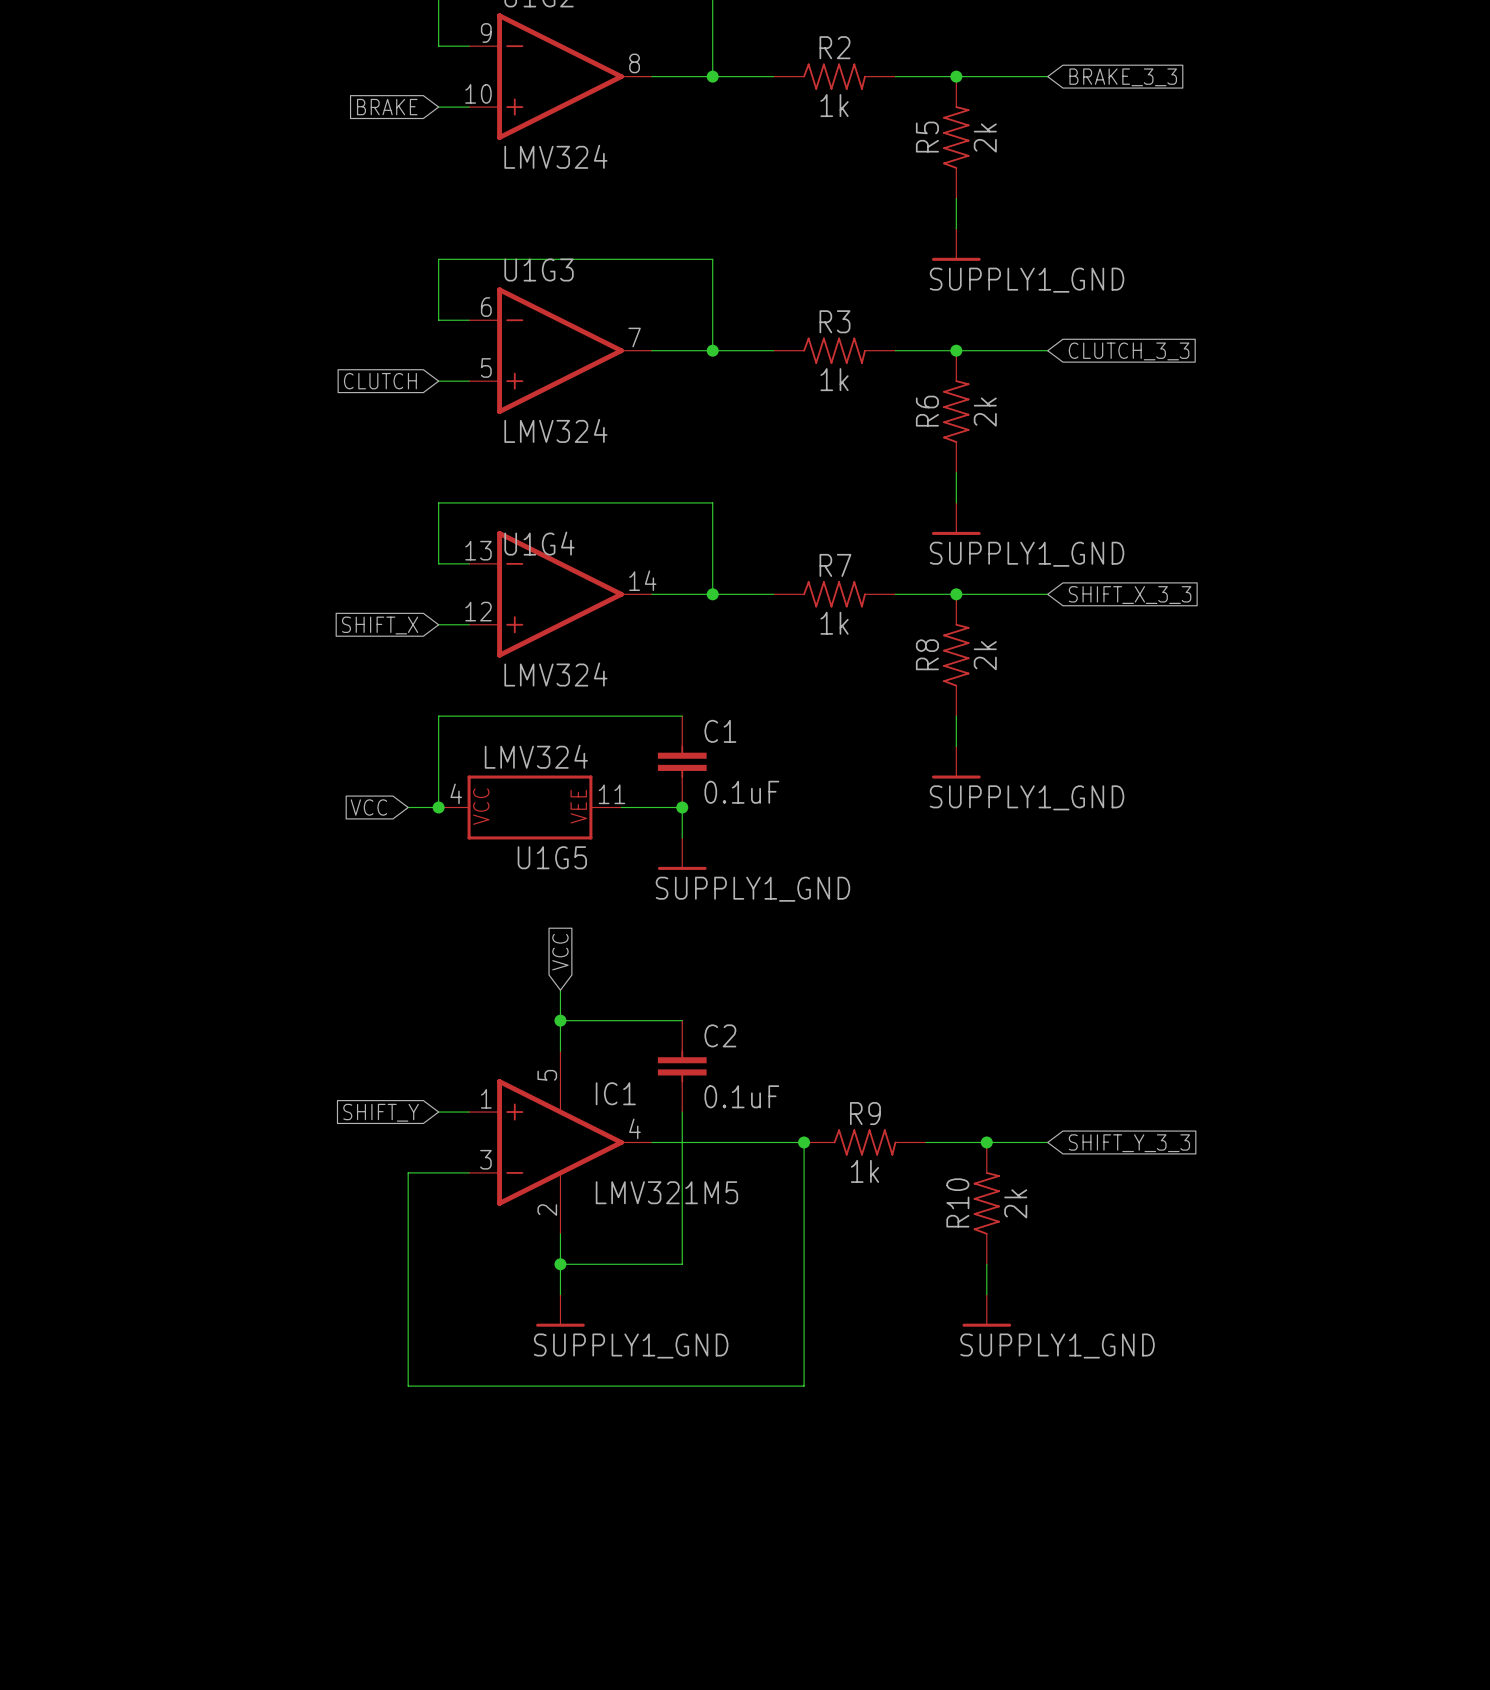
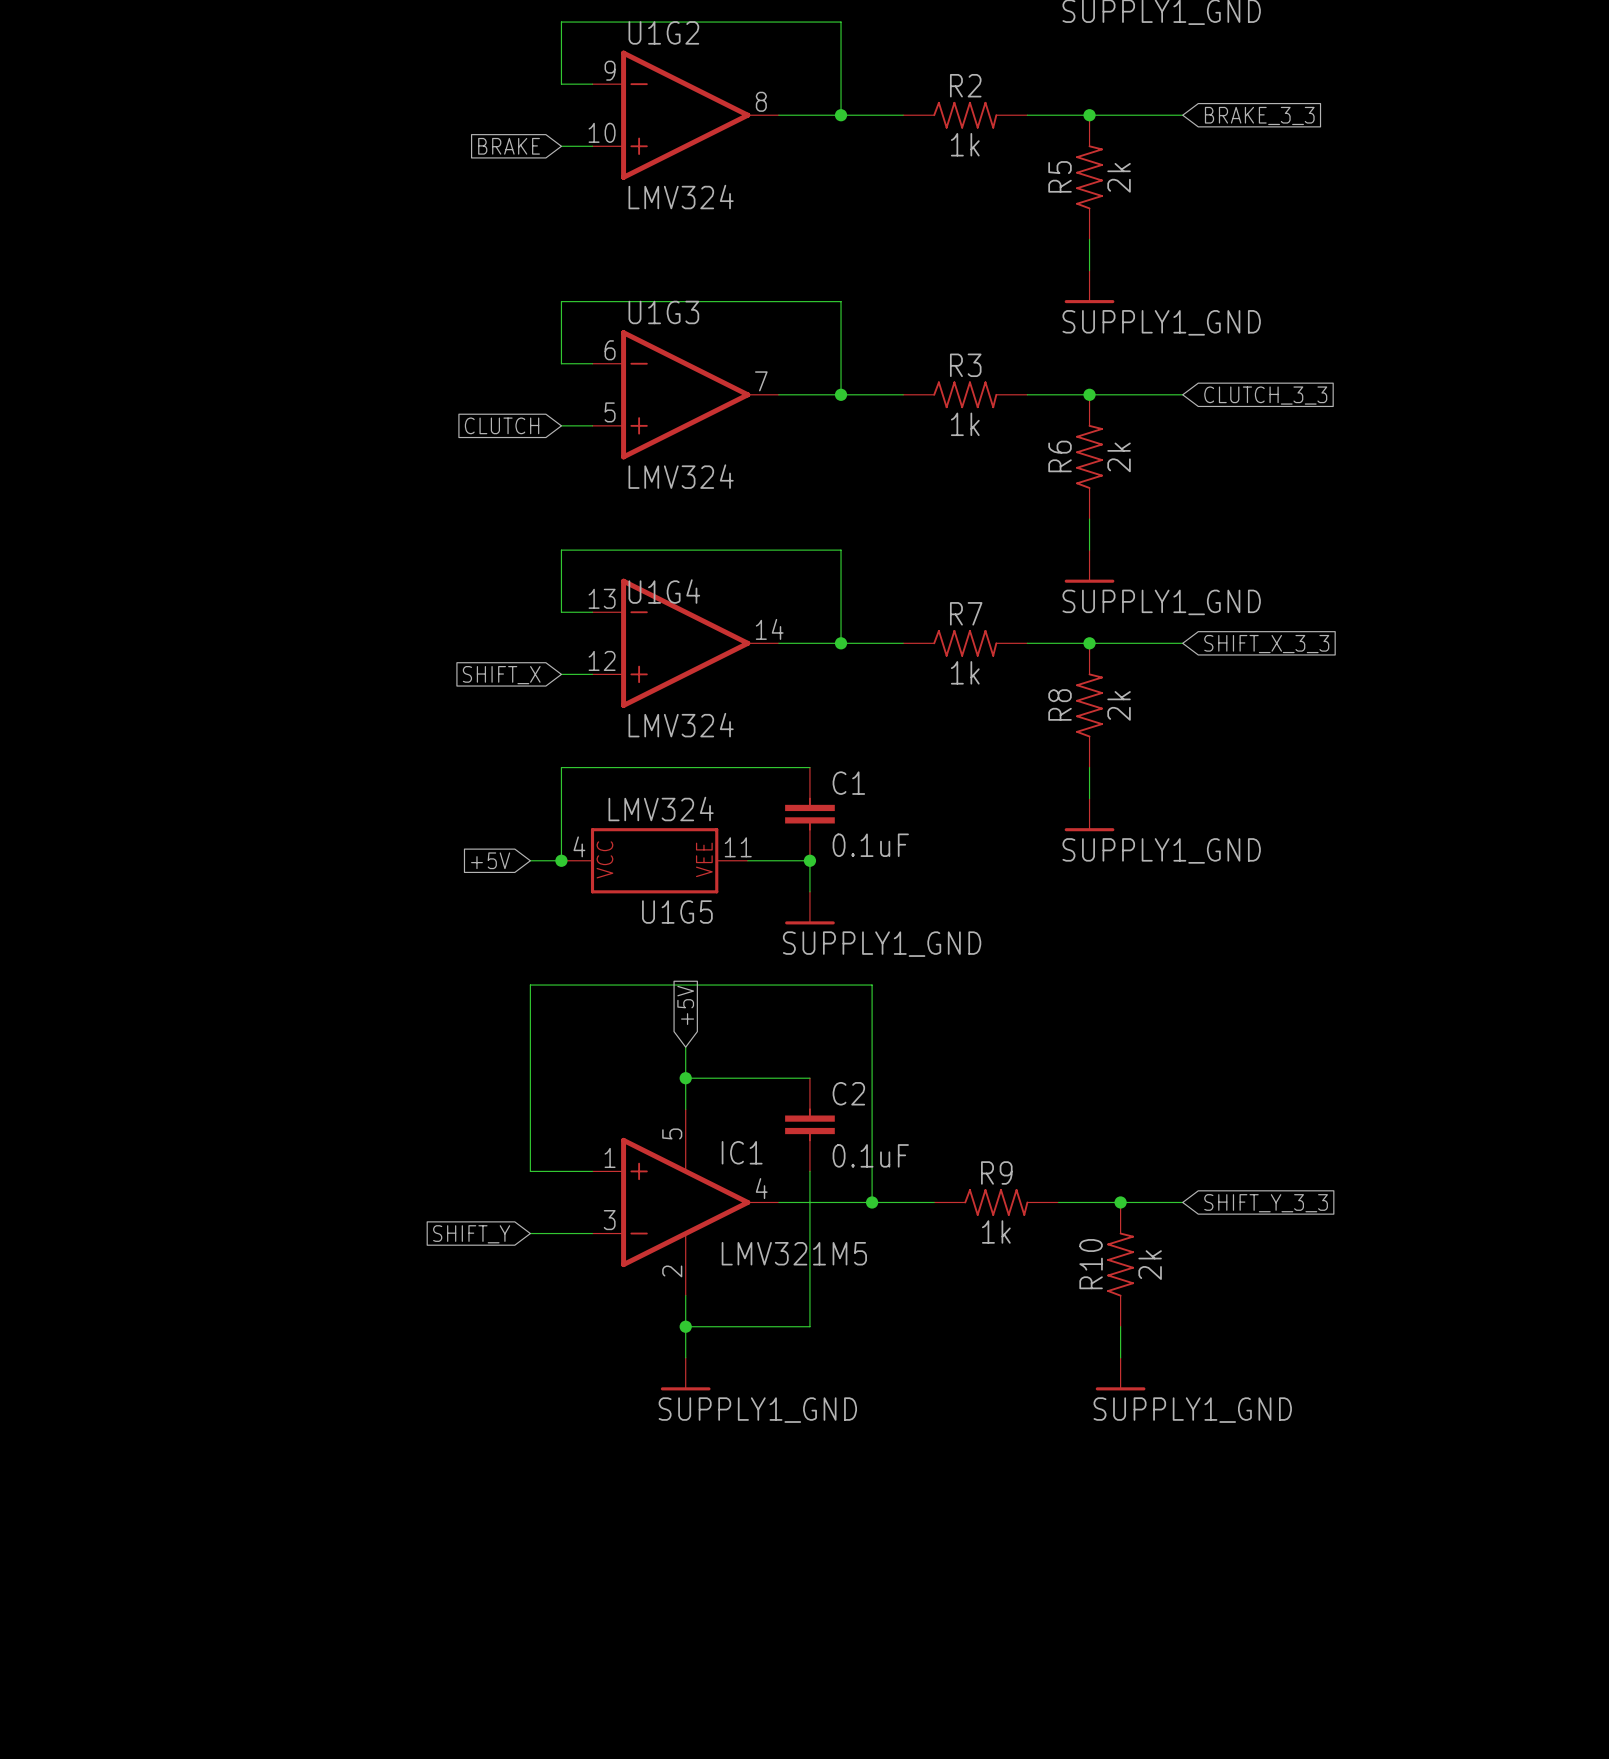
global label: VCC (368, 807) -> +5V (490, 860)
global label: VCC (560, 952) -> +5V (685, 1005)
global label position: SHIFT_Y (381, 1112) -> SHIFT_Y (471, 1234)
wire: none -> (561, 1171) (530, 1171) (530, 985) (872, 985) (872, 1202)
wire: (804, 1142) (804, 1386) (408, 1386) (408, 1172) -> none
junction position: (804, 1142) -> (872, 1202)

